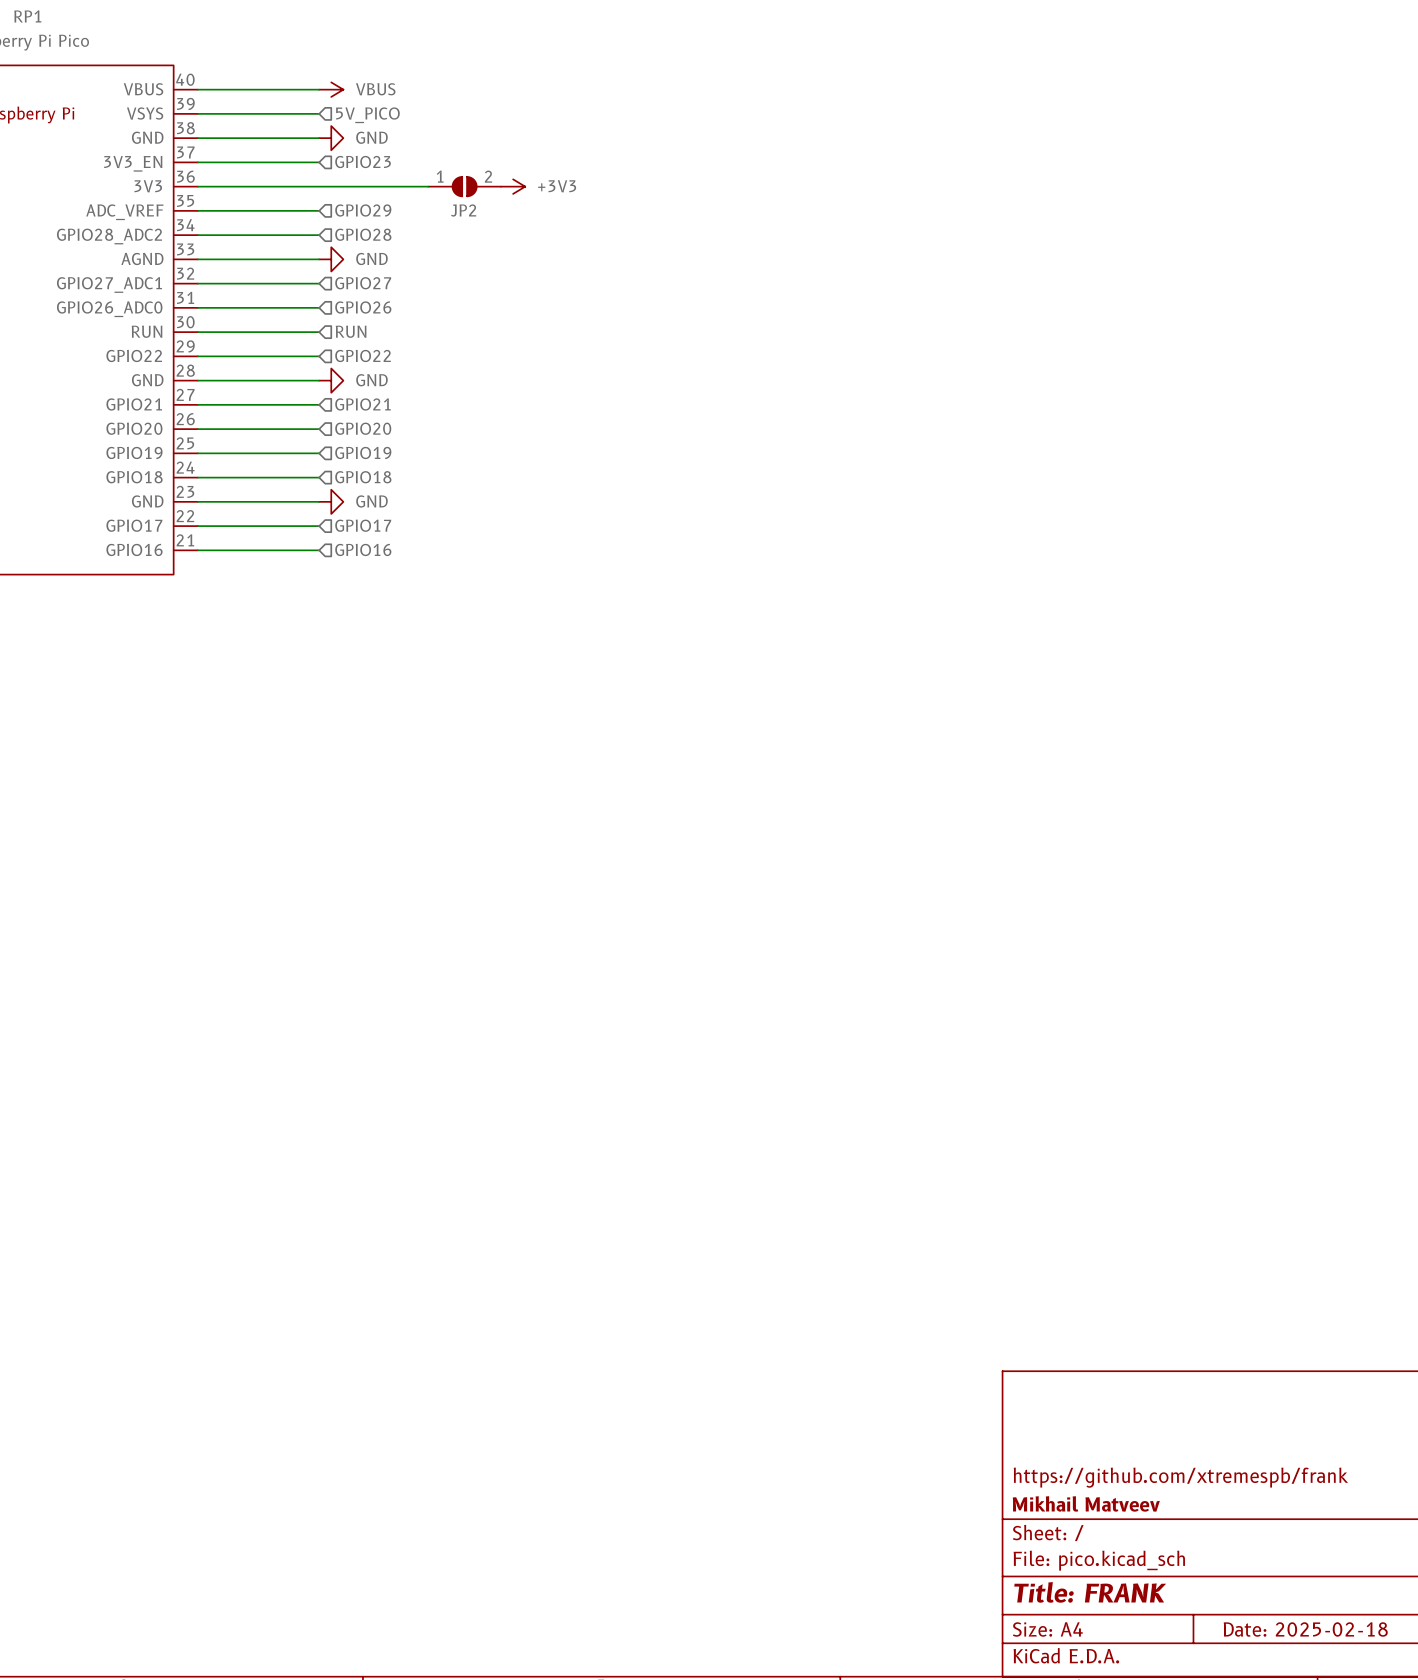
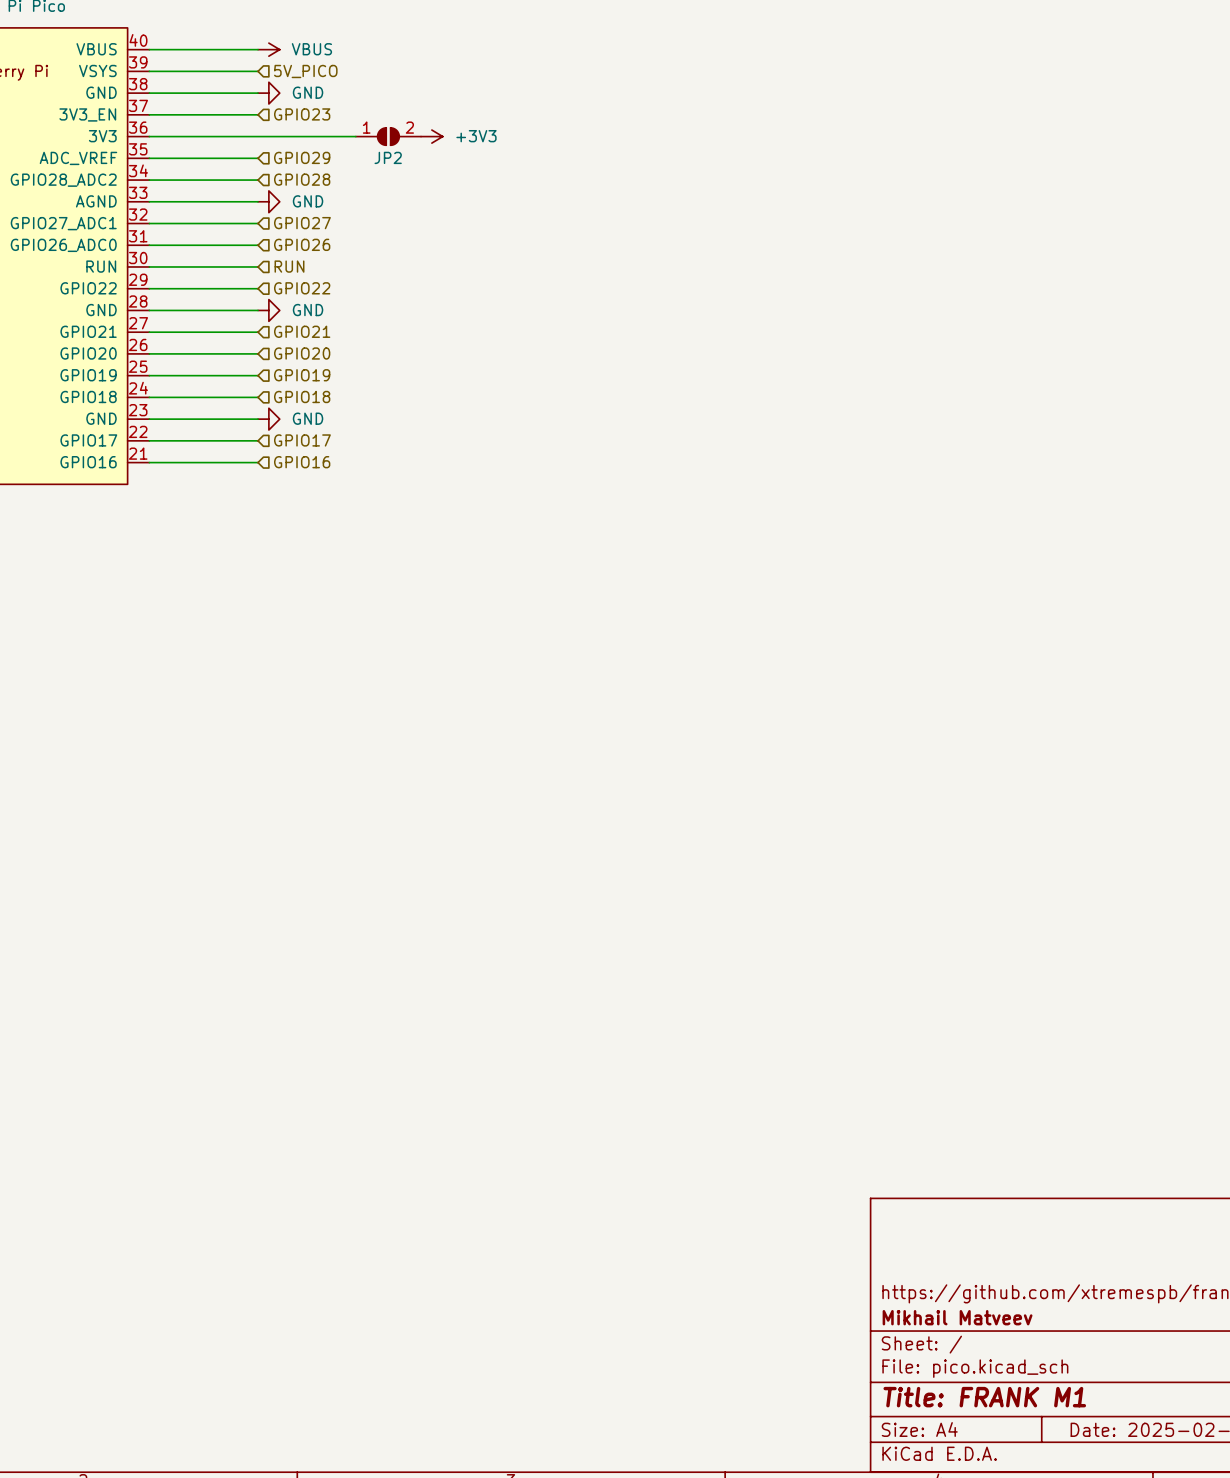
title block: Title: FRANK (1090, 1592) -> Title: FRANK M1 (984, 1397)

